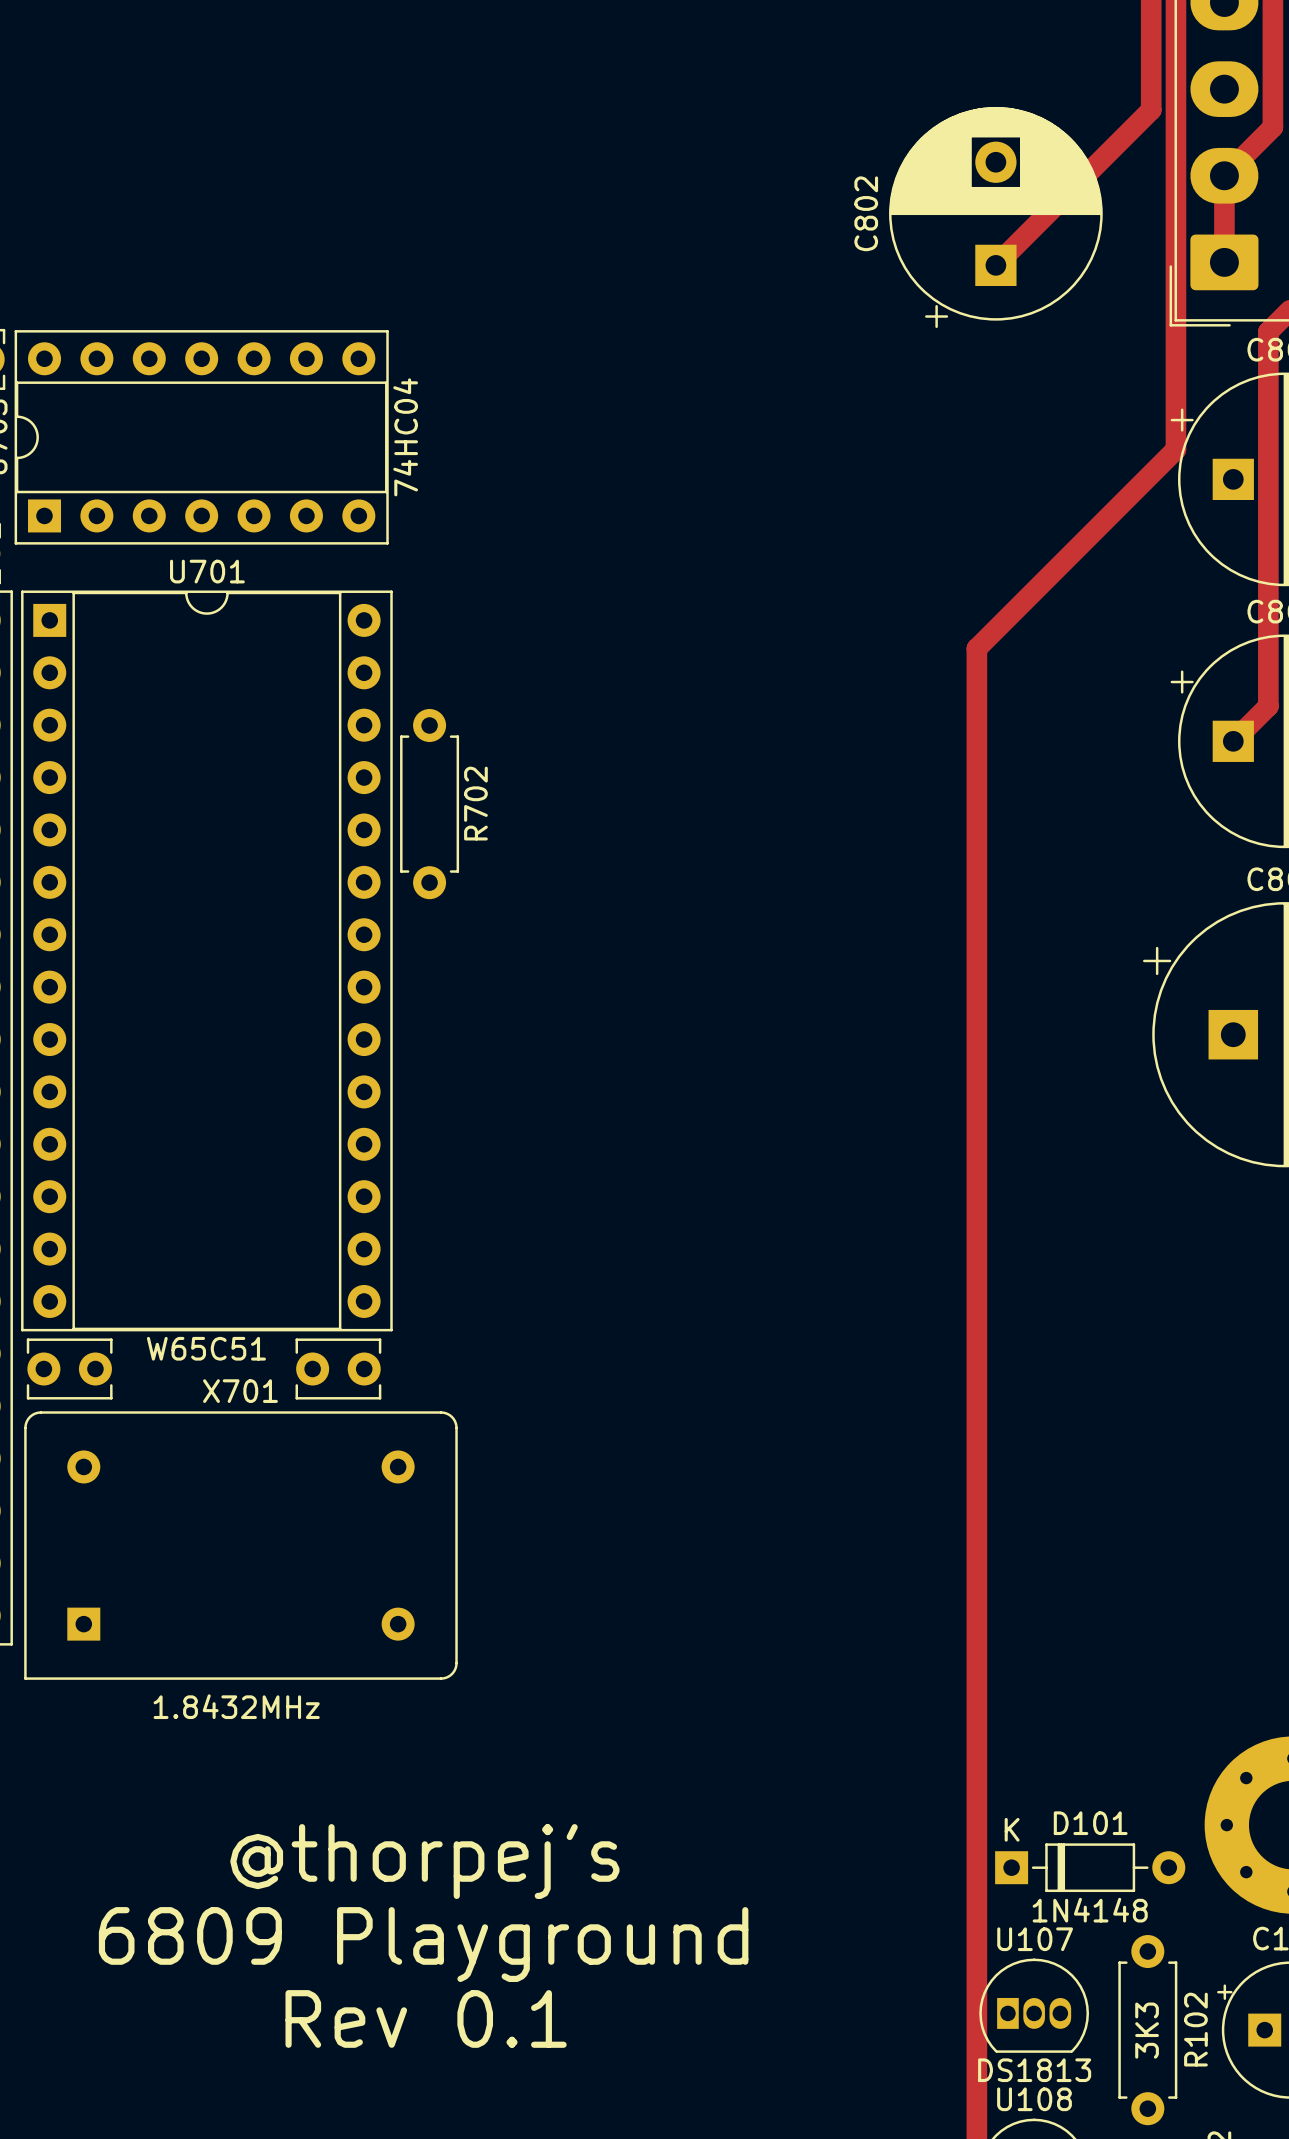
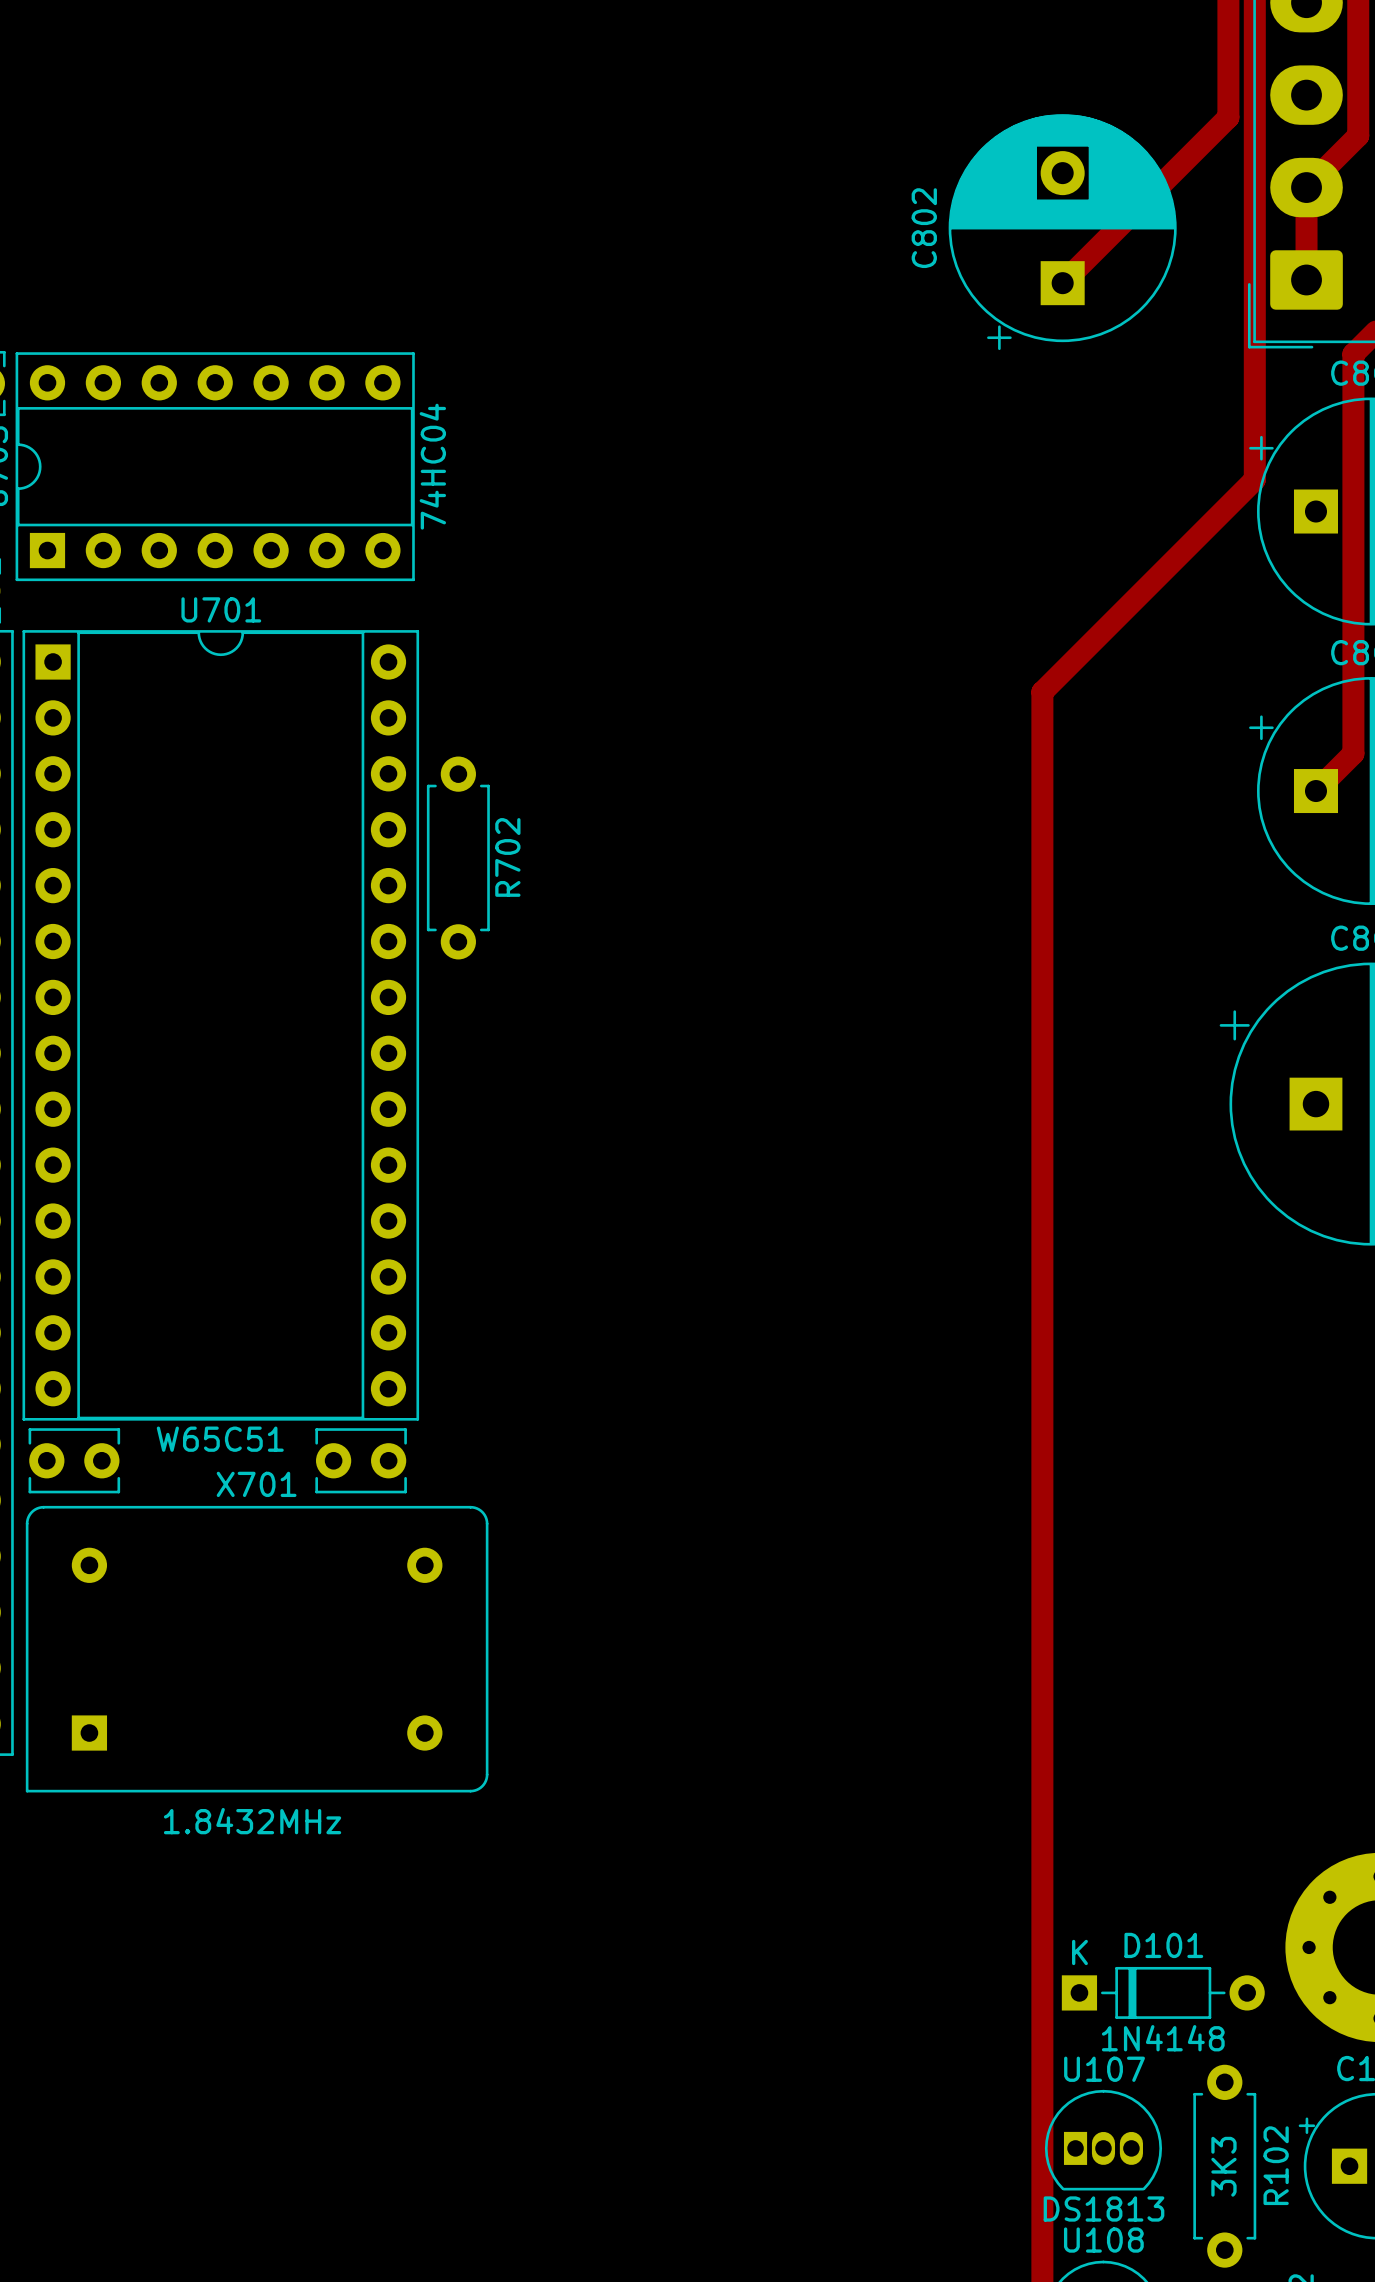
text: @thorpej's (424, 1861) -> none
text: 6809 Playground (423, 1944) -> none
text: Rev 0.1 (426, 2018) -> none

